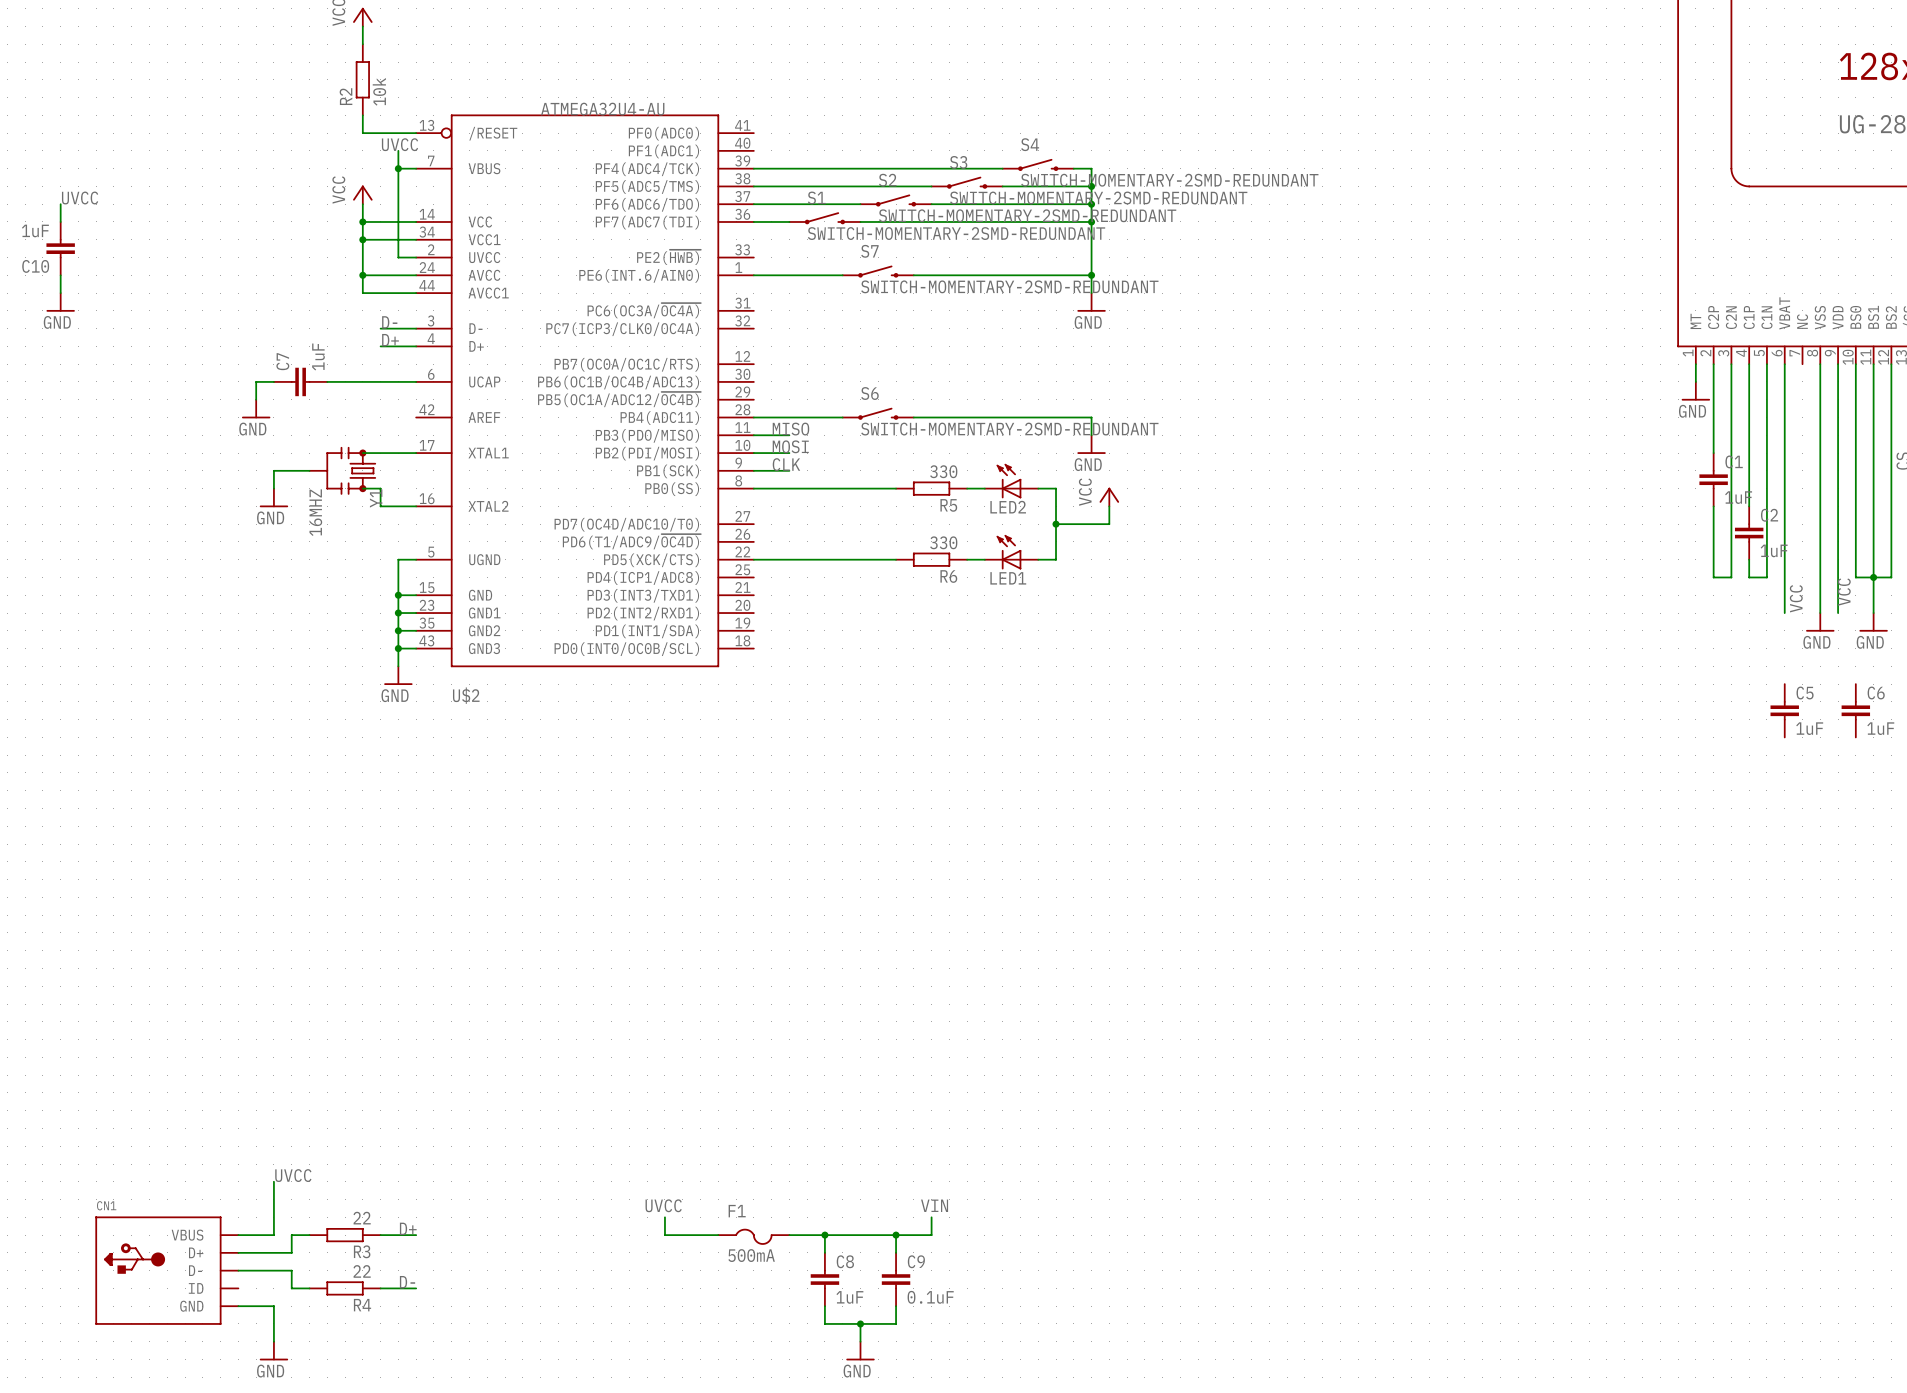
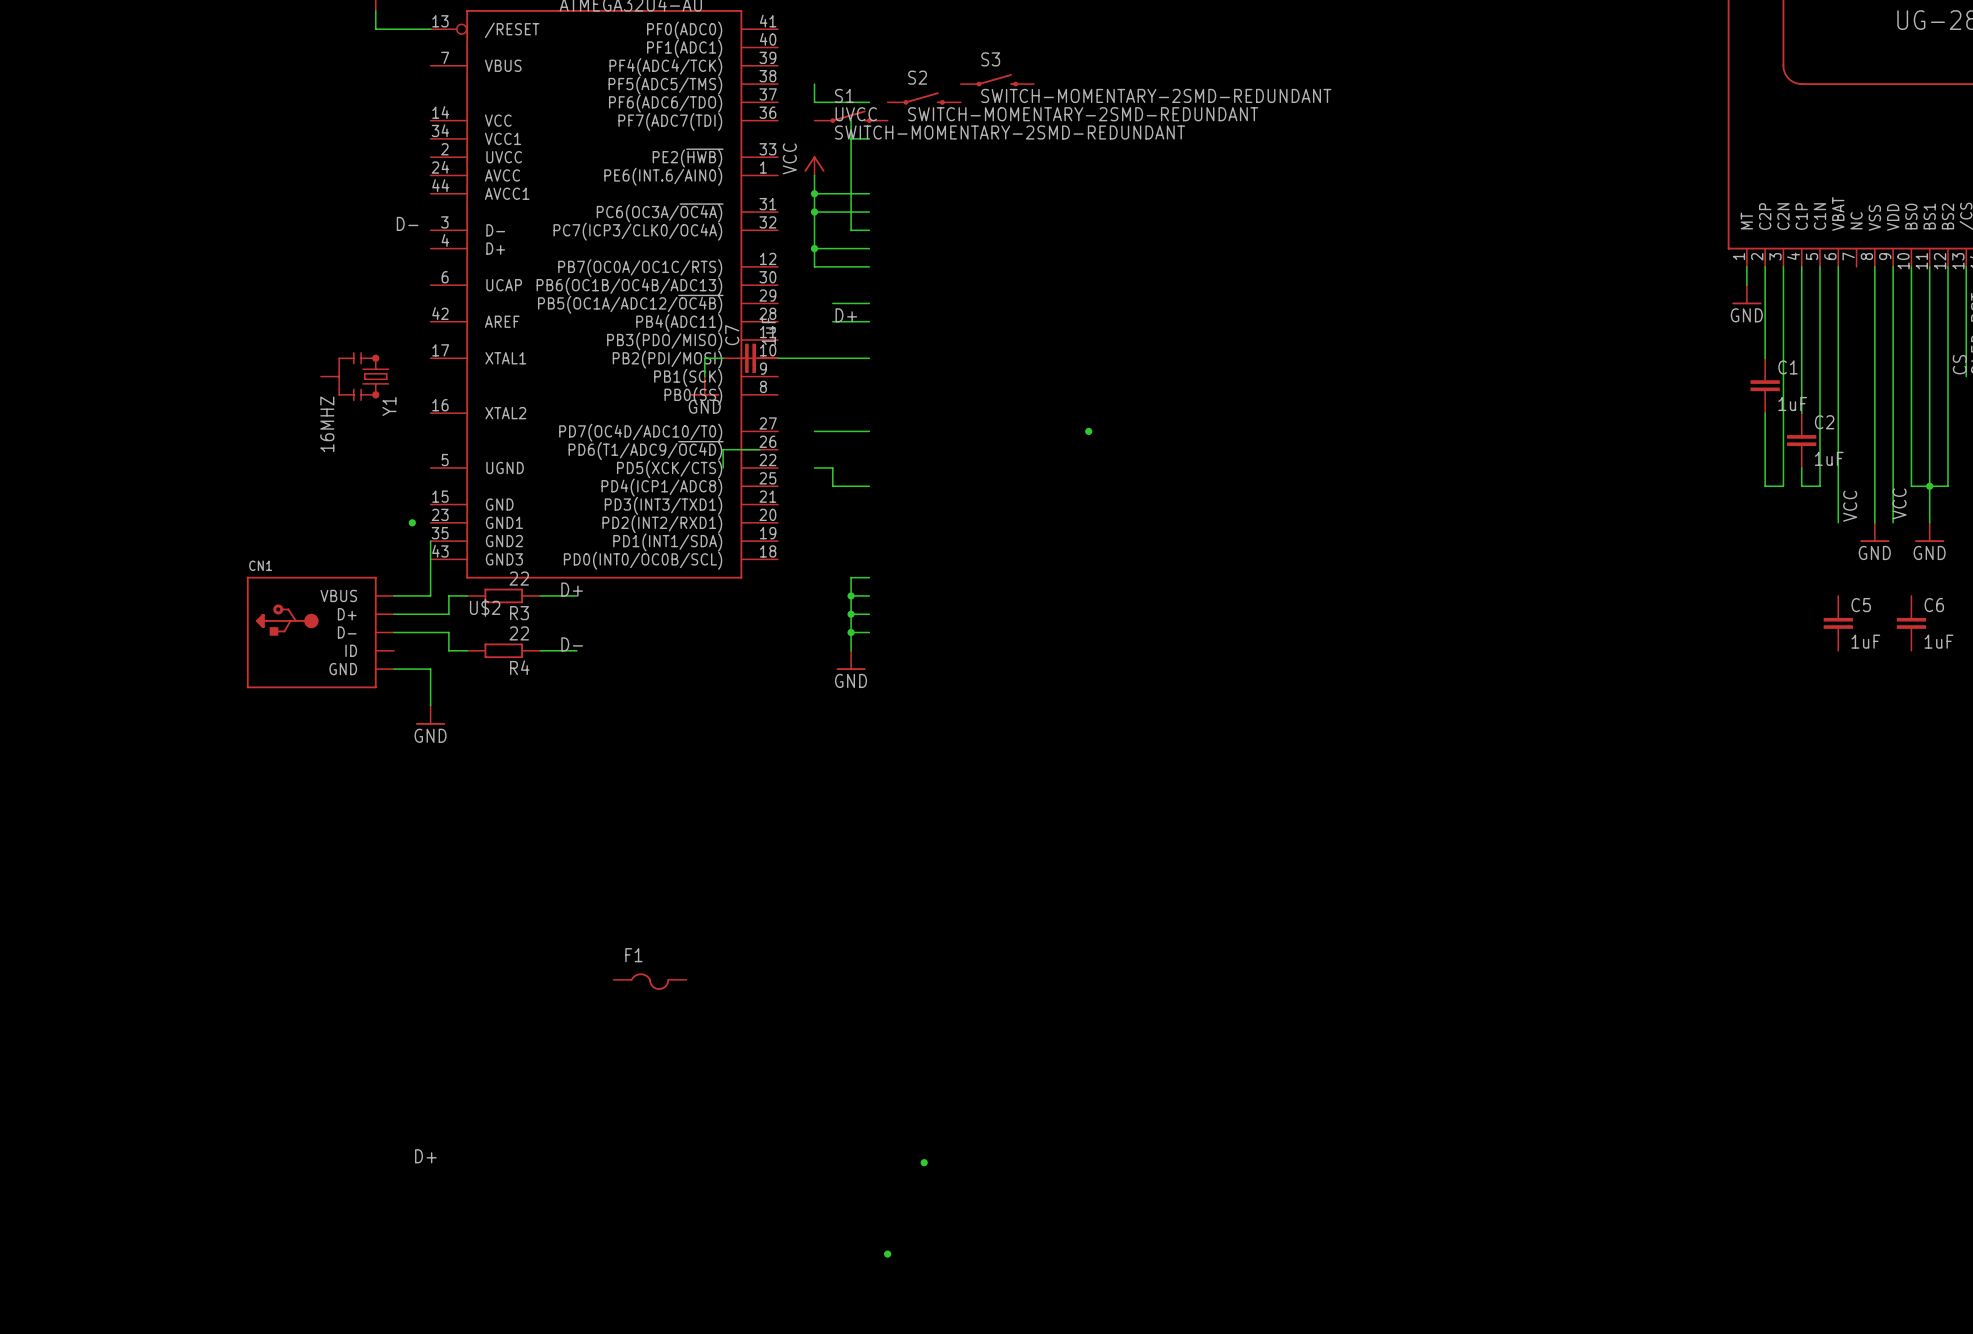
label: UVCC (399, 144) -> none
wire: (398, 150) (398, 257) (416, 257) -> none
S4: SWITCH-MOMENTARY-2SMD-REDUNDANT (1038, 164) -> none
wire: (398, 168) (416, 168) -> none
junction: (398, 168) -> none
wire: (753, 168) (1002, 168) -> none
wire: (1073, 168) (1091, 168) (1091, 293) -> none
wire: (753, 186) (931, 186) -> none
wire: (1002, 186) (1091, 186) -> none
junction: (1091, 186) -> none
power symbol: VCC (362, 194) -> none
label: UVCC (80, 197) -> none
wire: (60, 204) (60, 221) -> none
wire: (362, 204) (362, 293) (416, 293) -> none
wire: (753, 204) (789, 204) -> (814, 84) (814, 102)
wire: (842, 204) (860, 204) -> (851, 138) (869, 138)
wire: (931, 204) (1091, 204) -> none
junction: (1091, 204) -> none
label: none -> UVCC (856, 114)
wire: (362, 221) (416, 221) -> none
junction: (362, 221) -> none
wire: (753, 221) (789, 221) -> none
wire: none -> (851, 120) (851, 230) (869, 230)
wire: (860, 221) (1091, 221) -> none
junction: (1091, 221) -> none
wire: (362, 239) (416, 239) -> none
junction: (362, 239) -> none
C10: 1uF (60, 248) -> none
power symbol: none -> VCC (814, 165)
S7: SWITCH-MOMENTARY-2SMD-REDUNDANT (878, 271) -> none
wire: (60, 275) (60, 293) -> none
wire: (362, 275) (416, 275) -> none
junction: (362, 275) -> none
wire: (753, 275) (842, 275) -> none
wire: none -> (814, 175) (814, 266) (869, 266)
wire: (913, 275) (1091, 275) -> none
junction: (1091, 275) -> none
wire: none -> (814, 193) (869, 193)
junction: none -> (814, 193)
power symbol: GND (60, 302) -> none
power symbol: GND (1091, 302) -> none
wire: none -> (814, 212) (869, 212)
junction: none -> (814, 212)
wire: (380, 328) (416, 328) -> none
label: D+ (390, 340) -> none
wire: (380, 346) (416, 346) -> none
wire: none -> (814, 248) (869, 248)
junction: none -> (814, 248)
wire: (273, 381) (256, 381) (256, 399) -> none
C7 position: (300, 381) -> (750, 358)
wire: (327, 381) (416, 381) -> none
power symbol: GND (256, 409) -> none
label: none -> D+ (846, 315)
S6: SWITCH-MOMENTARY-2SMD-REDUNDANT (878, 413) -> none
wire: (753, 417) (807, 417) -> (814, 358) (869, 358)
wire: (913, 417) (1091, 417) (1091, 435) -> none
label: MISO (790, 429) -> none
wire: (753, 435) (789, 435) -> (832, 303) (869, 303)
power symbol: GND (1091, 444) -> none
label: MOSI (790, 446) -> none
wire: (362, 453) (416, 453) -> none
wire: none -> (723, 358) (704, 358) (704, 376)
label: CLK (786, 464) -> none
wire: (309, 470) (273, 470) (273, 488) -> none
wire: (753, 470) (789, 470) -> none
power symbol: none -> GND (704, 386)
LED2: (1011, 481) -> none
wire: (362, 488) (380, 488) (380, 506) (416, 506) -> none
wire: (753, 488) (896, 488) -> none
R5: 330 (931, 488) -> none
wire: (967, 488) (984, 488) -> none
wire: (1038, 488) (1056, 488) (1056, 559) (1038, 559) -> none
power symbol: GND (273, 497) -> none
power symbol: VCC (1109, 497) -> none
wire: (1109, 506) (1109, 524) (1056, 524) -> none
wire: none -> (814, 431) (869, 431)
wire: none -> (759, 449) (723, 449) (723, 467)
LED1: (1011, 552) -> none
wire: (416, 559) (398, 559) (398, 666) -> none
wire: (753, 559) (789, 559) -> none
wire: (807, 559) (896, 559) -> (832, 467) (832, 486) (869, 486)
R6: 330 (931, 559) -> none
wire: (967, 559) (984, 559) -> none
wire: (398, 595) (416, 595) -> none
junction: (398, 595) -> none
wire: (398, 613) (416, 613) -> none
wire: (398, 630) (416, 630) -> (394, 595) (430, 595) (430, 541)
junction: (398, 630) -> none
wire: (398, 648) (416, 648) -> none
junction: (398, 648) -> none
wire: none -> (869, 577) (851, 577) (851, 650)
power symbol position: GND (398, 675) -> GND (430, 715)
label: none -> D+ (572, 589)
wire: none -> (467, 595) (448, 595) (448, 614) (394, 614)
wire: none -> (540, 595) (576, 595)
wire: none -> (851, 595) (869, 595)
junction: none -> (851, 595)
wire: none -> (851, 614) (869, 614)
junction: none -> (851, 614)
wire: none -> (394, 632) (448, 632) (448, 650) (467, 650)
wire: none -> (851, 632) (869, 632)
junction: none -> (851, 632)
label: none -> D- (572, 644)
wire: none -> (540, 650) (576, 650)
power symbol: none -> GND (851, 660)
wire: none -> (394, 669) (430, 669) (430, 705)
label: UVCC (293, 1175) -> none
wire: (273, 1181) (273, 1235) (238, 1235) -> none
label: UVCC (663, 1205) -> none
label: VIN (934, 1205) -> none
wire: (664, 1217) (664, 1235) (718, 1235) -> none
wire: (931, 1217) (931, 1235) (789, 1235) -> none
wire: (309, 1235) (291, 1235) (291, 1252) (238, 1252) -> none
R3 position: (345, 1235) -> (503, 595)
wire: (380, 1235) (416, 1235) -> none
wire: (824, 1235) (824, 1252) -> none
junction: (824, 1235) -> none
wire: (896, 1235) (896, 1252) -> none
F1 position: (753, 1236) -> (649, 981)
F1 value: 500mA (751, 1255) -> none
CN1 position: (166, 1270) -> (320, 632)
wire: (238, 1270) (291, 1270) (291, 1288) (309, 1288) -> none
C8: 1uF (824, 1279) -> none
C9: 0.1uF (896, 1279) -> none
label: D- (407, 1282) -> none
R4 position: (345, 1288) -> (503, 650)
wire: (380, 1288) (416, 1288) -> none
wire: (238, 1306) (273, 1306) (273, 1341) -> none
wire: (824, 1306) (824, 1323) (896, 1323) (896, 1306) -> none
wire: (860, 1323) (860, 1341) -> none
power symbol: GND (273, 1351) -> none
power symbol: GND (860, 1351) -> none

